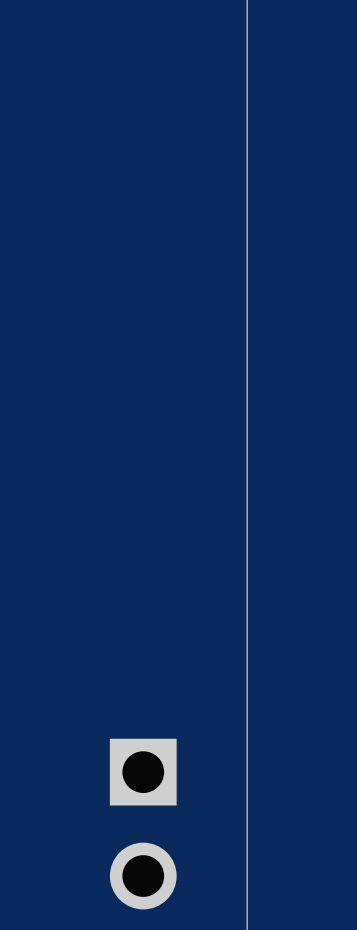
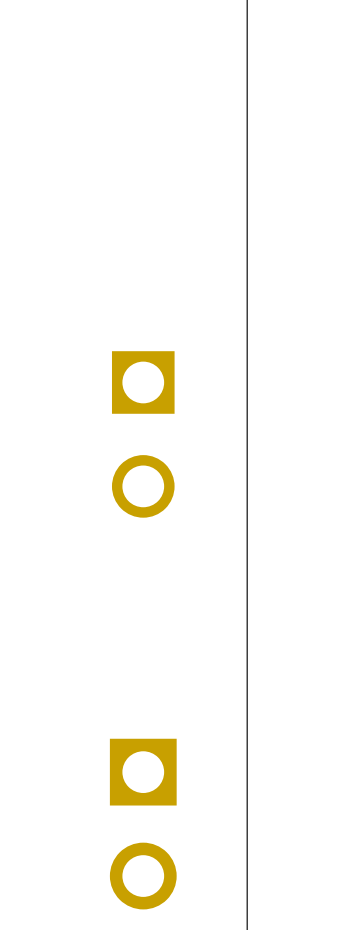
part: none -> (143, 434)

